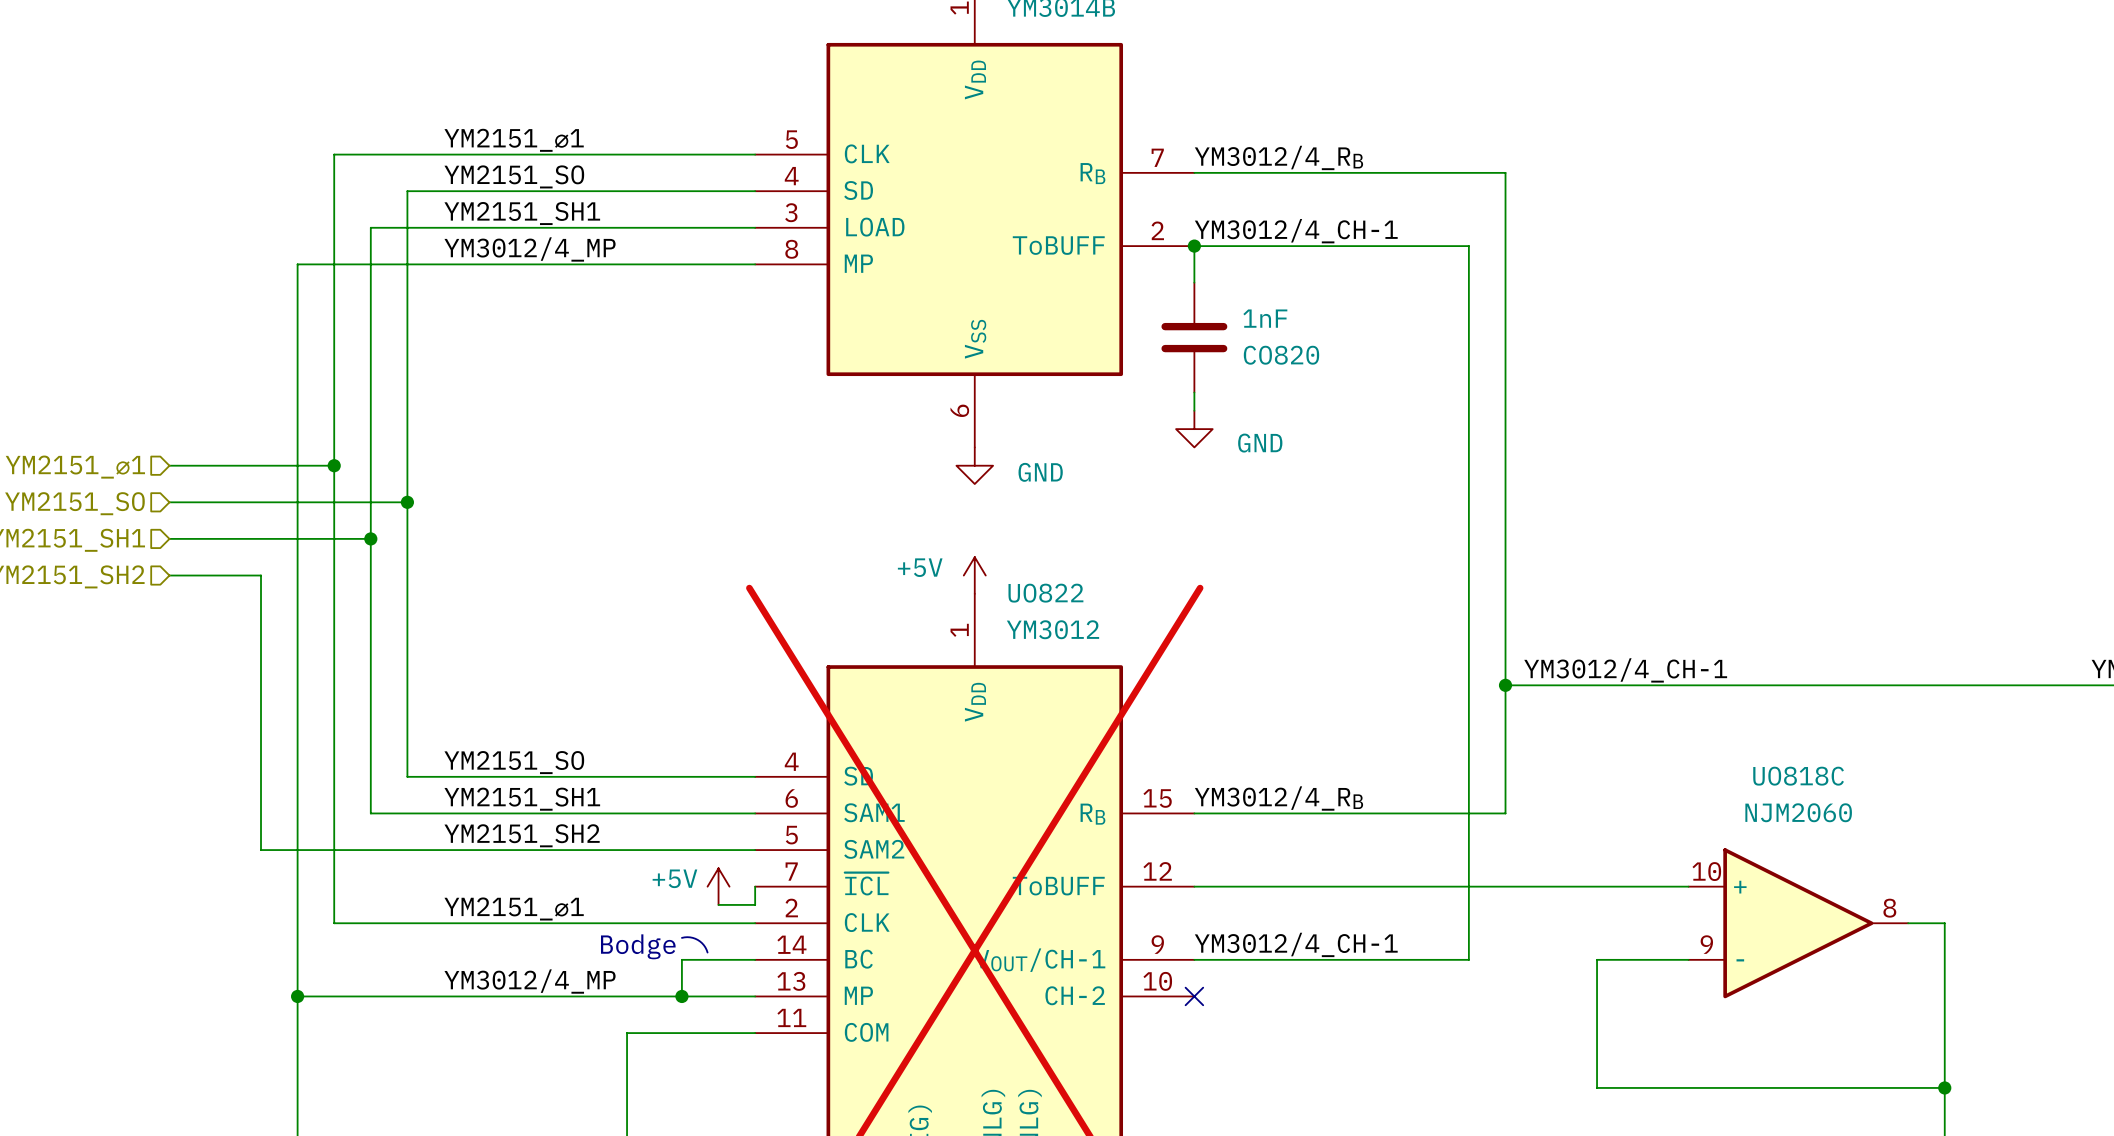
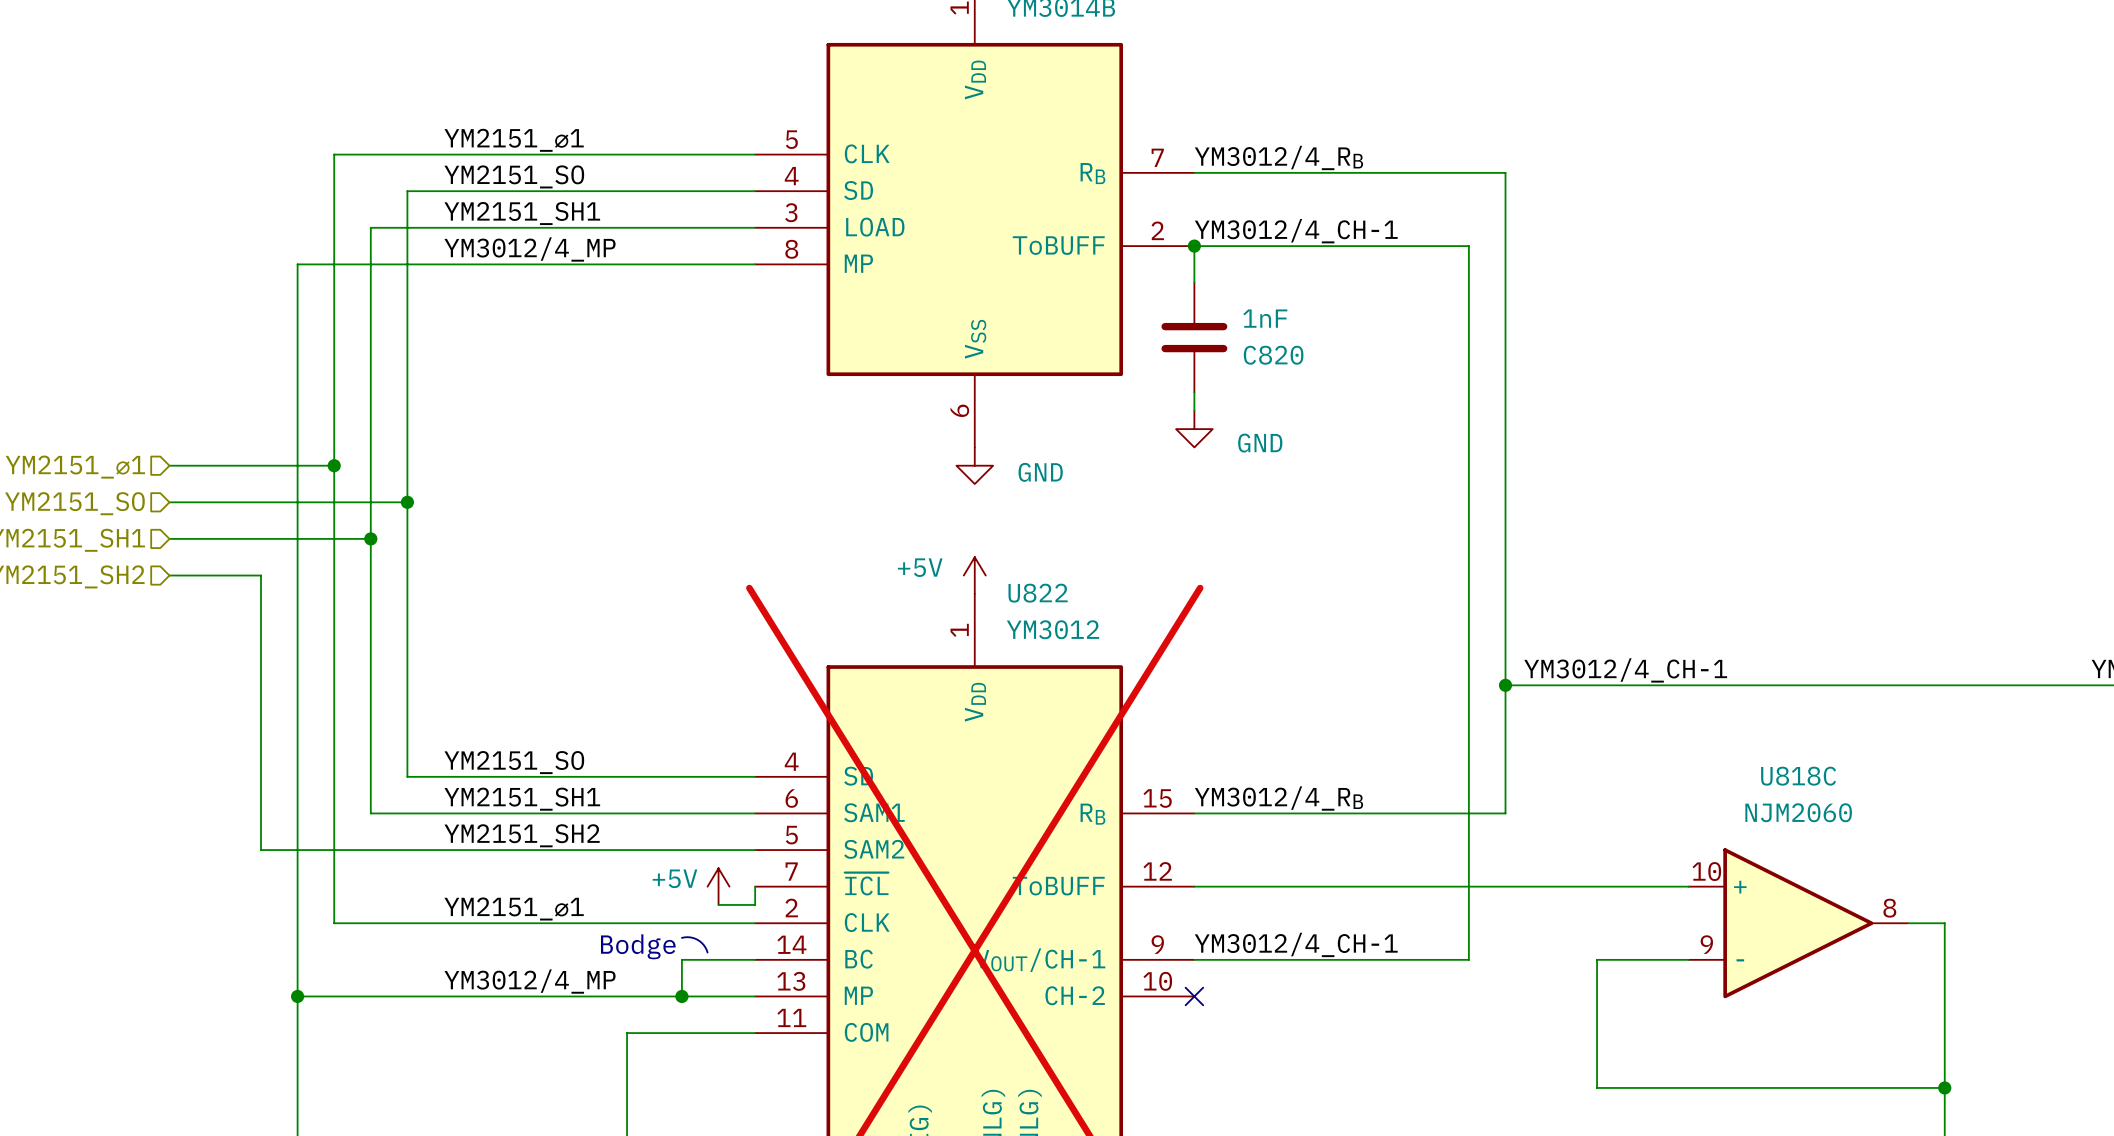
CO820 name: CO820 (1281, 355) -> C820 (1273, 355)
UO822 name: UO822 (1045, 593) -> U822 (1038, 593)
UO818C name: UO818C (1798, 776) -> U818C (1798, 776)

